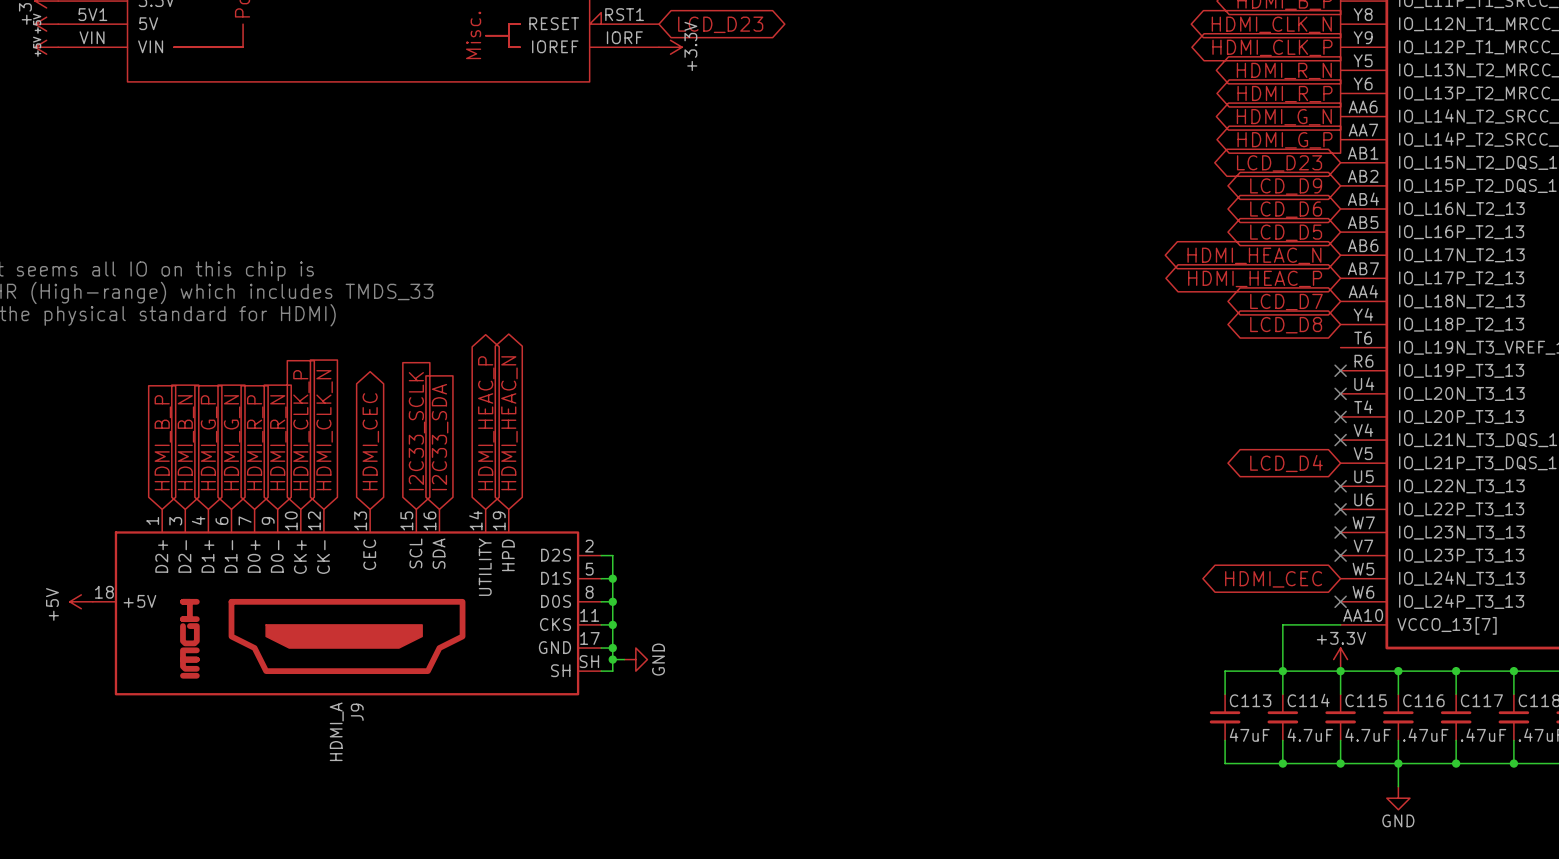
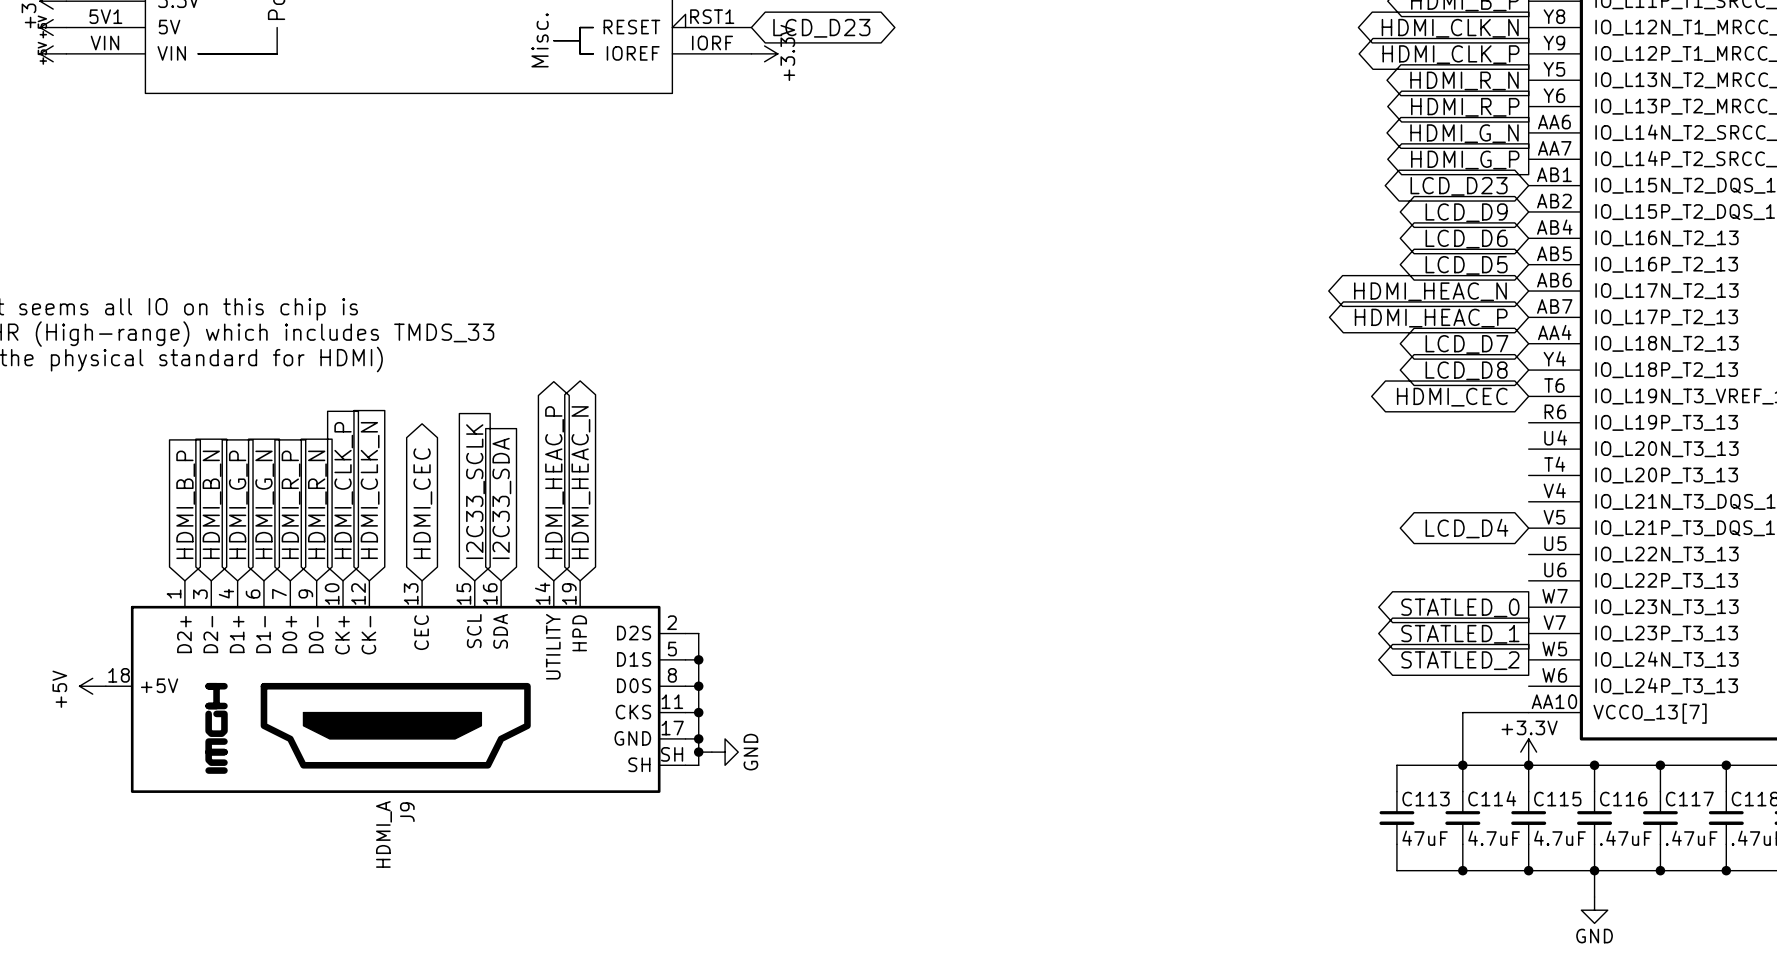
global label: none -> HDMI_CEC (1452, 397)
no-connect mark: (1340, 370) -> none
no-connect mark: (1340, 393) -> none
no-connect mark: (1340, 416) -> none
no-connect mark: (1340, 440) -> none
no-connect mark: (1340, 486) -> none
no-connect mark: (1340, 509) -> none
no-connect mark: (1340, 532) -> none
global label: none -> STATLED_0 (1460, 607)
no-connect mark: (1340, 555) -> none
global label: none -> STATLED_1 (1460, 634)
global label shape: bidirectional (1273, 579) -> output (1460, 660)
global label: HDMI_CEC (1273, 579) -> STATLED_2 (1460, 660)
no-connect mark: (1340, 601) -> none

